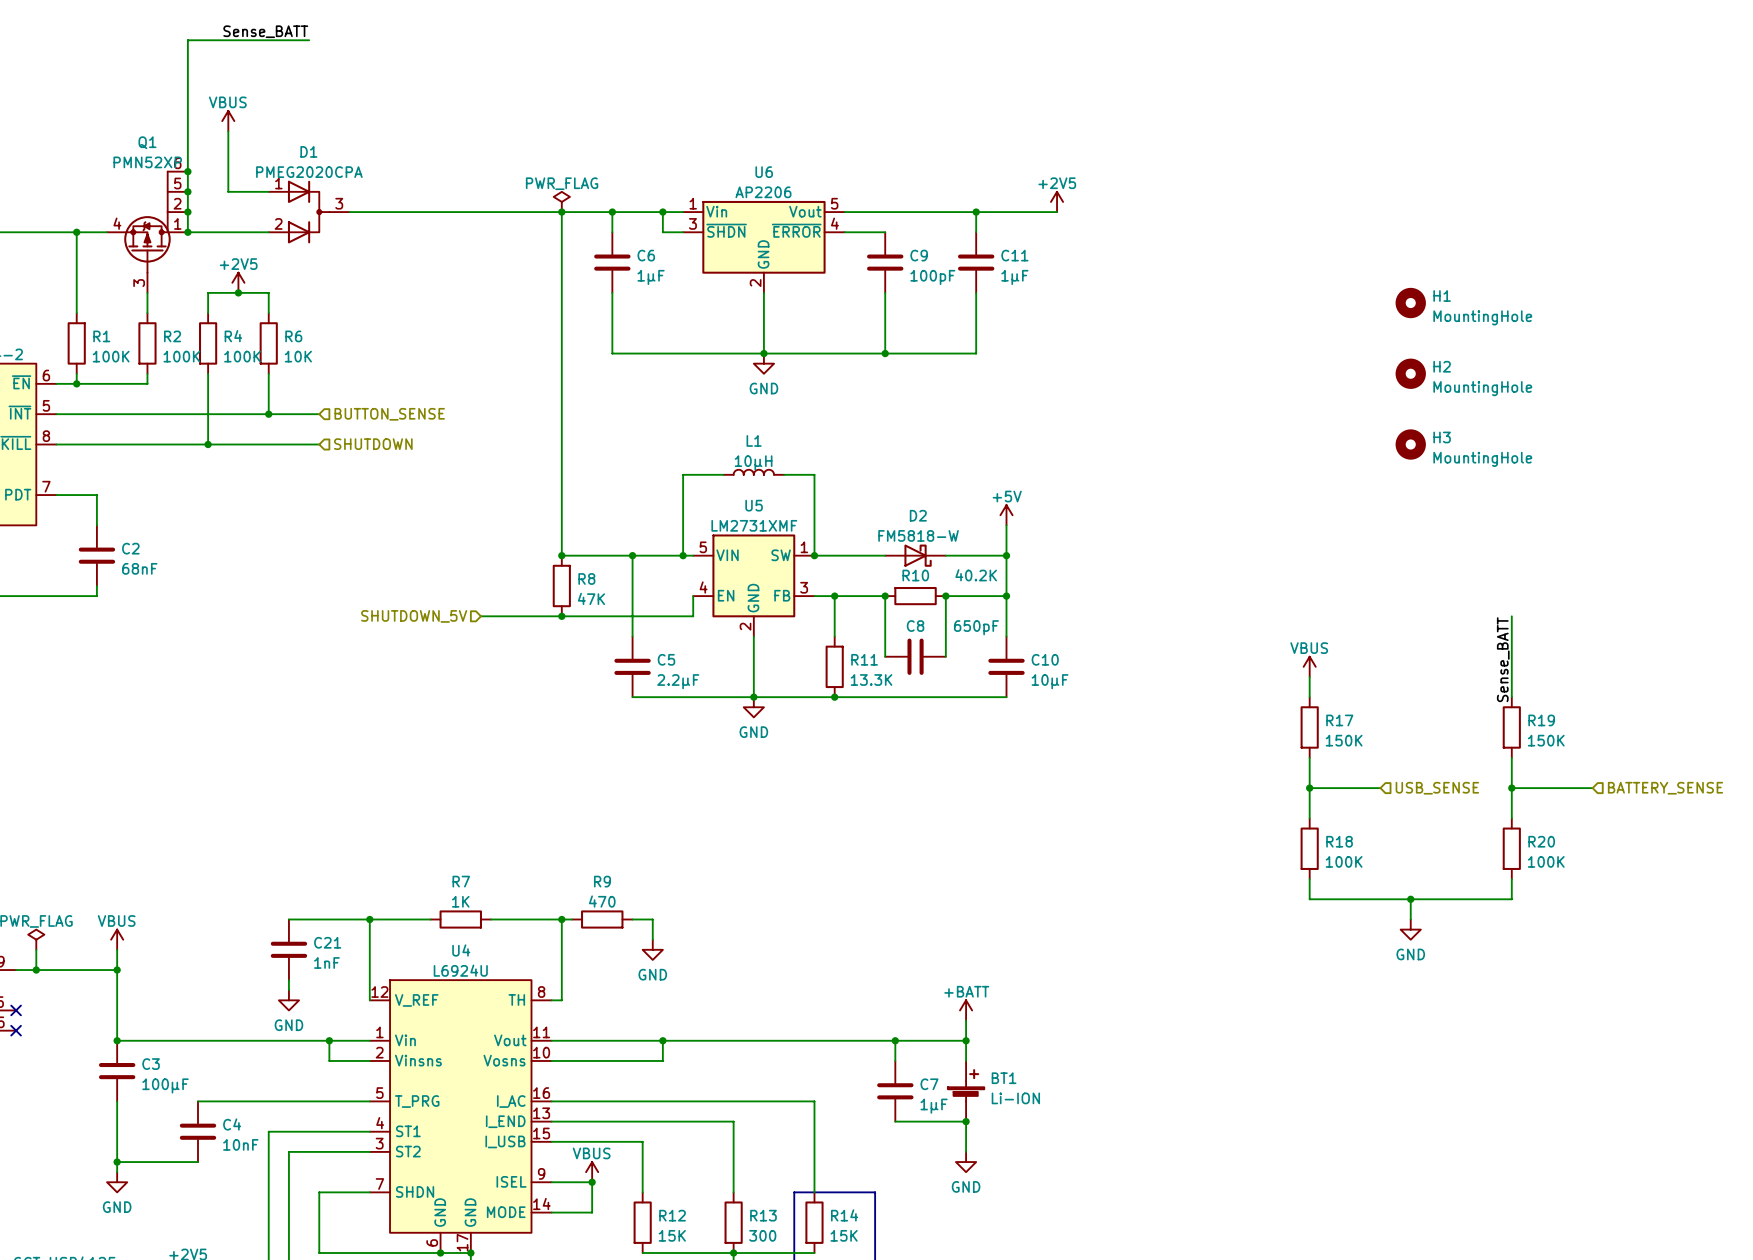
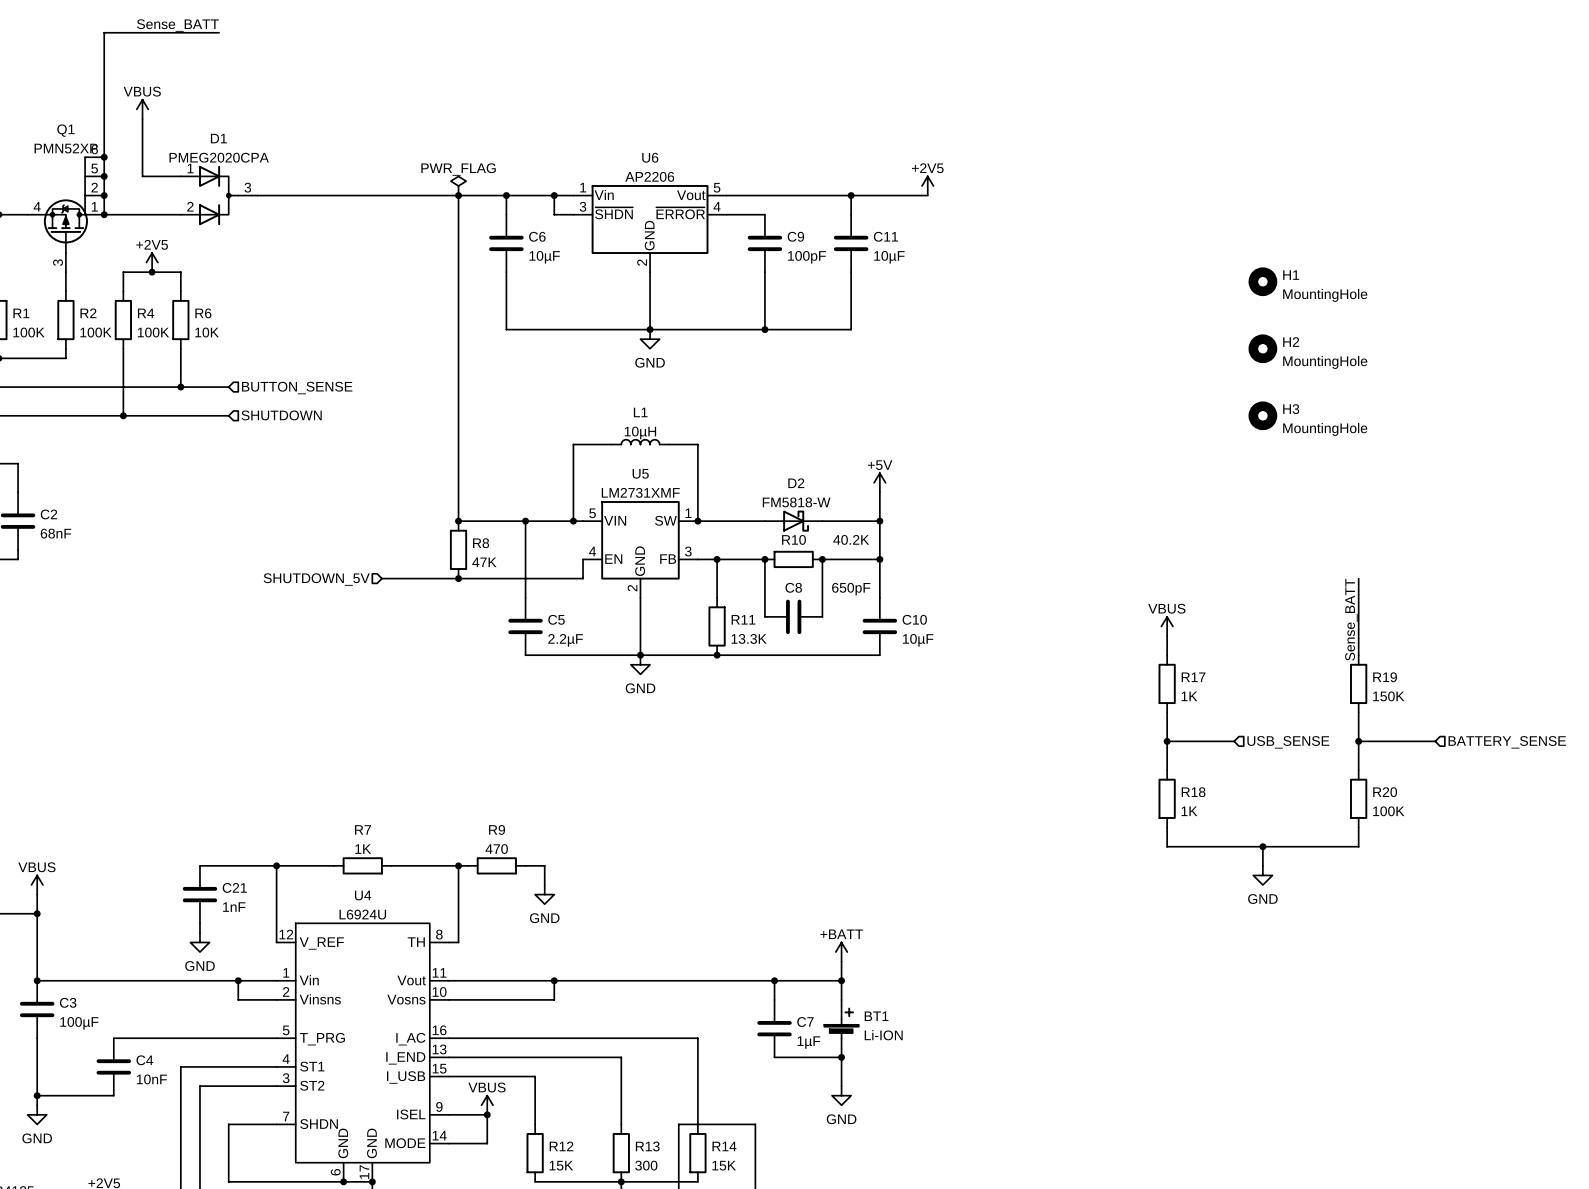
C6 value: 1µF (651, 277) -> 10µF (544, 257)
C11 value: 1µF (1014, 277) -> 10µF (889, 257)
R17 value: 150K (1344, 740) -> 1K (1189, 696)
R18 value: 100K (1344, 861) -> 1K (1189, 811)

